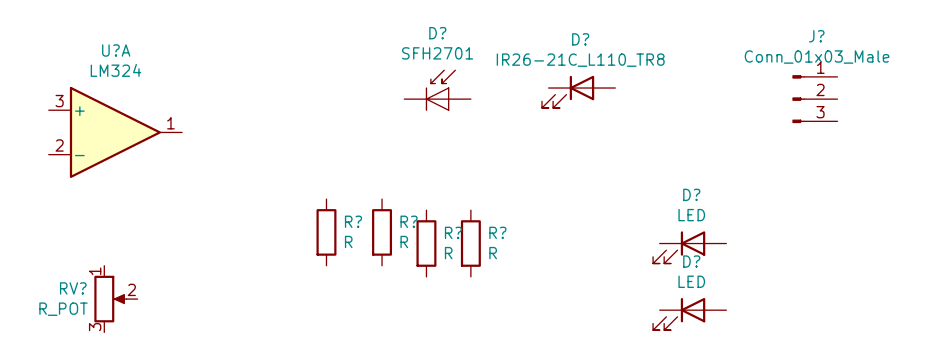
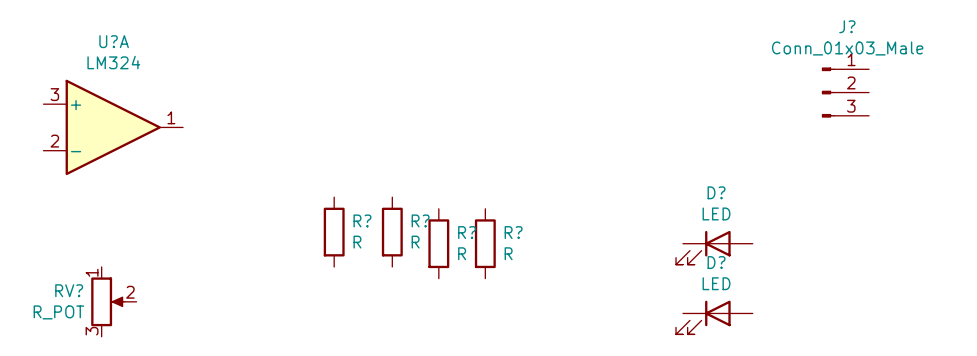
D?: SFH2701 (437, 90) -> none
D?: IR26-21C_L110_TR8 (578, 91) -> none

